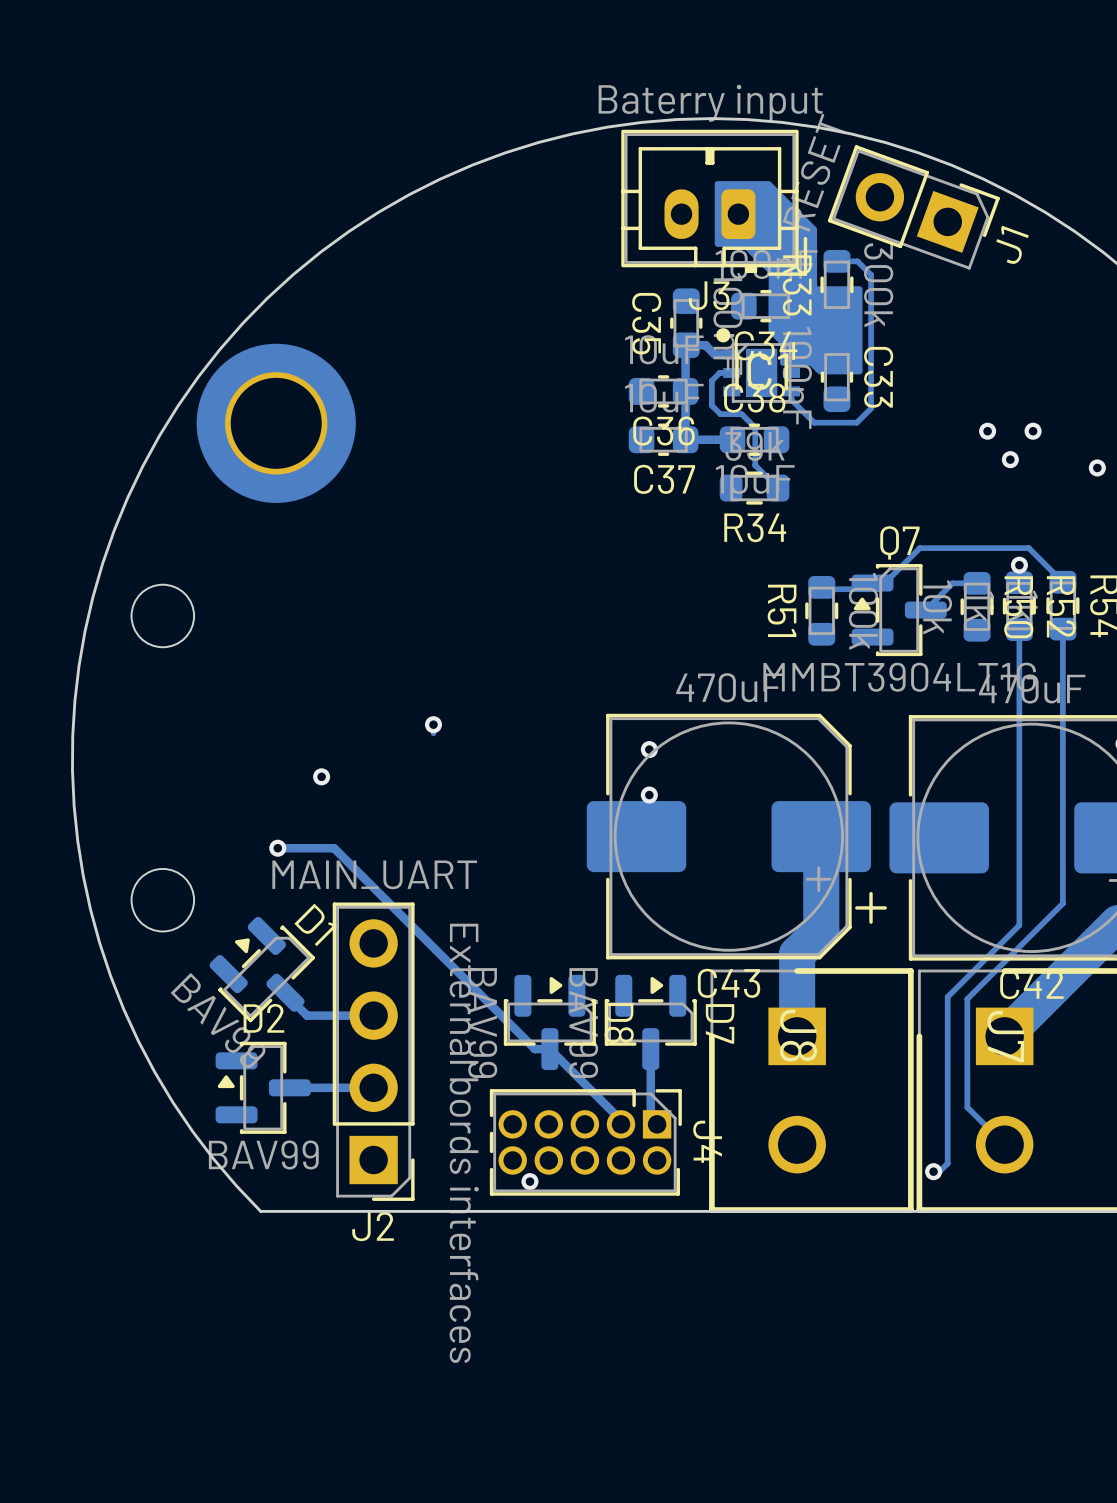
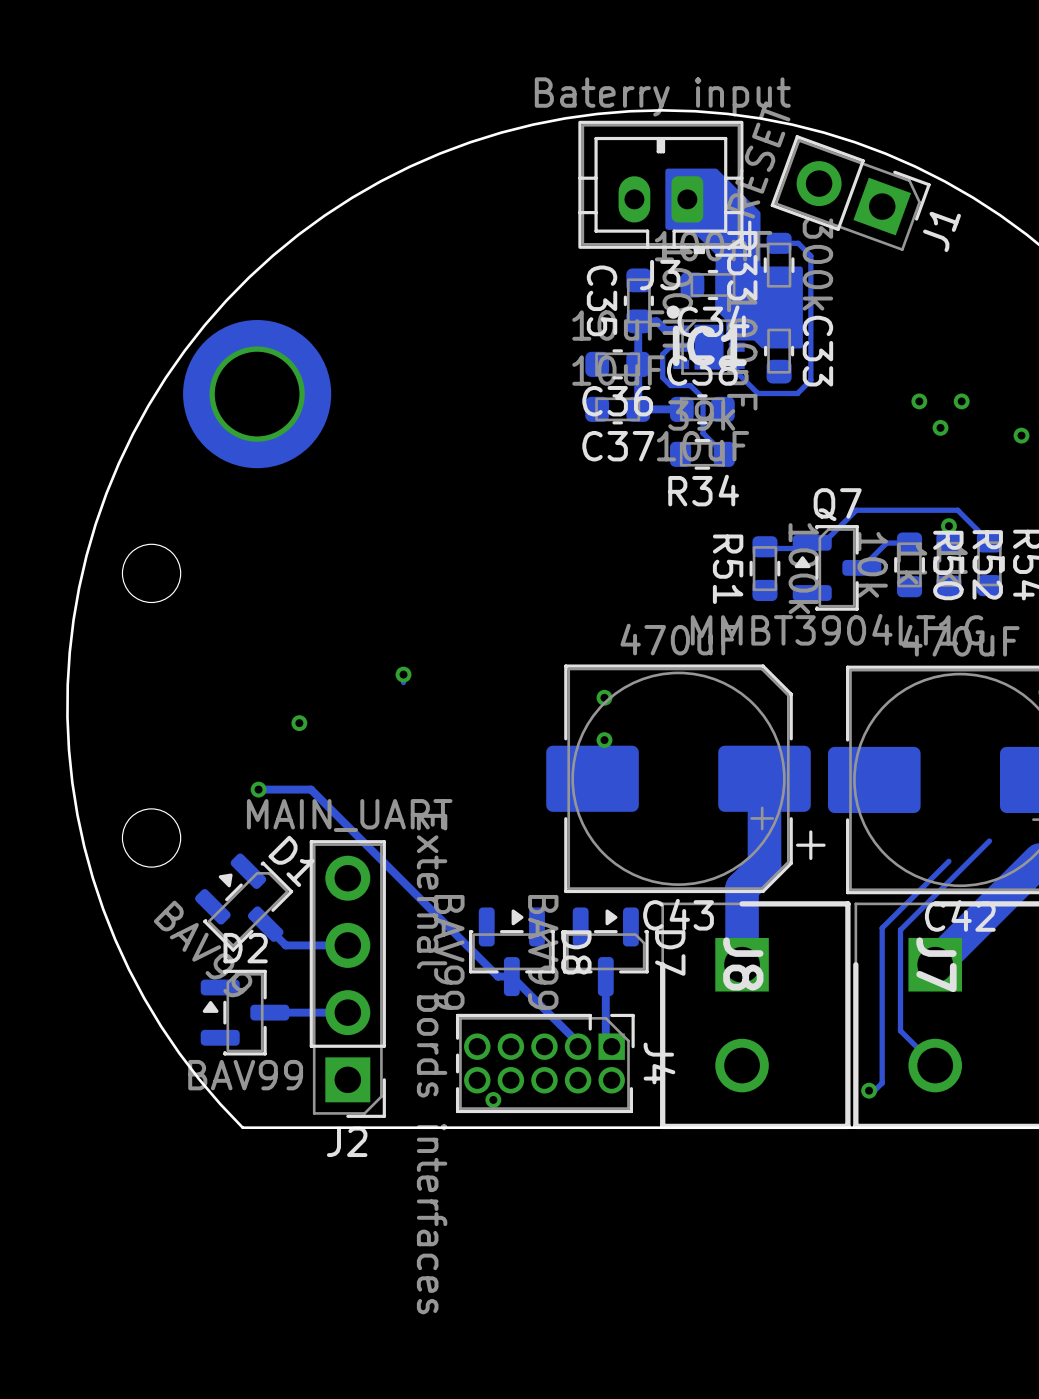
track: (1019, 629) (1019, 925) -> none
track: (1062, 629) (1062, 903) -> none

